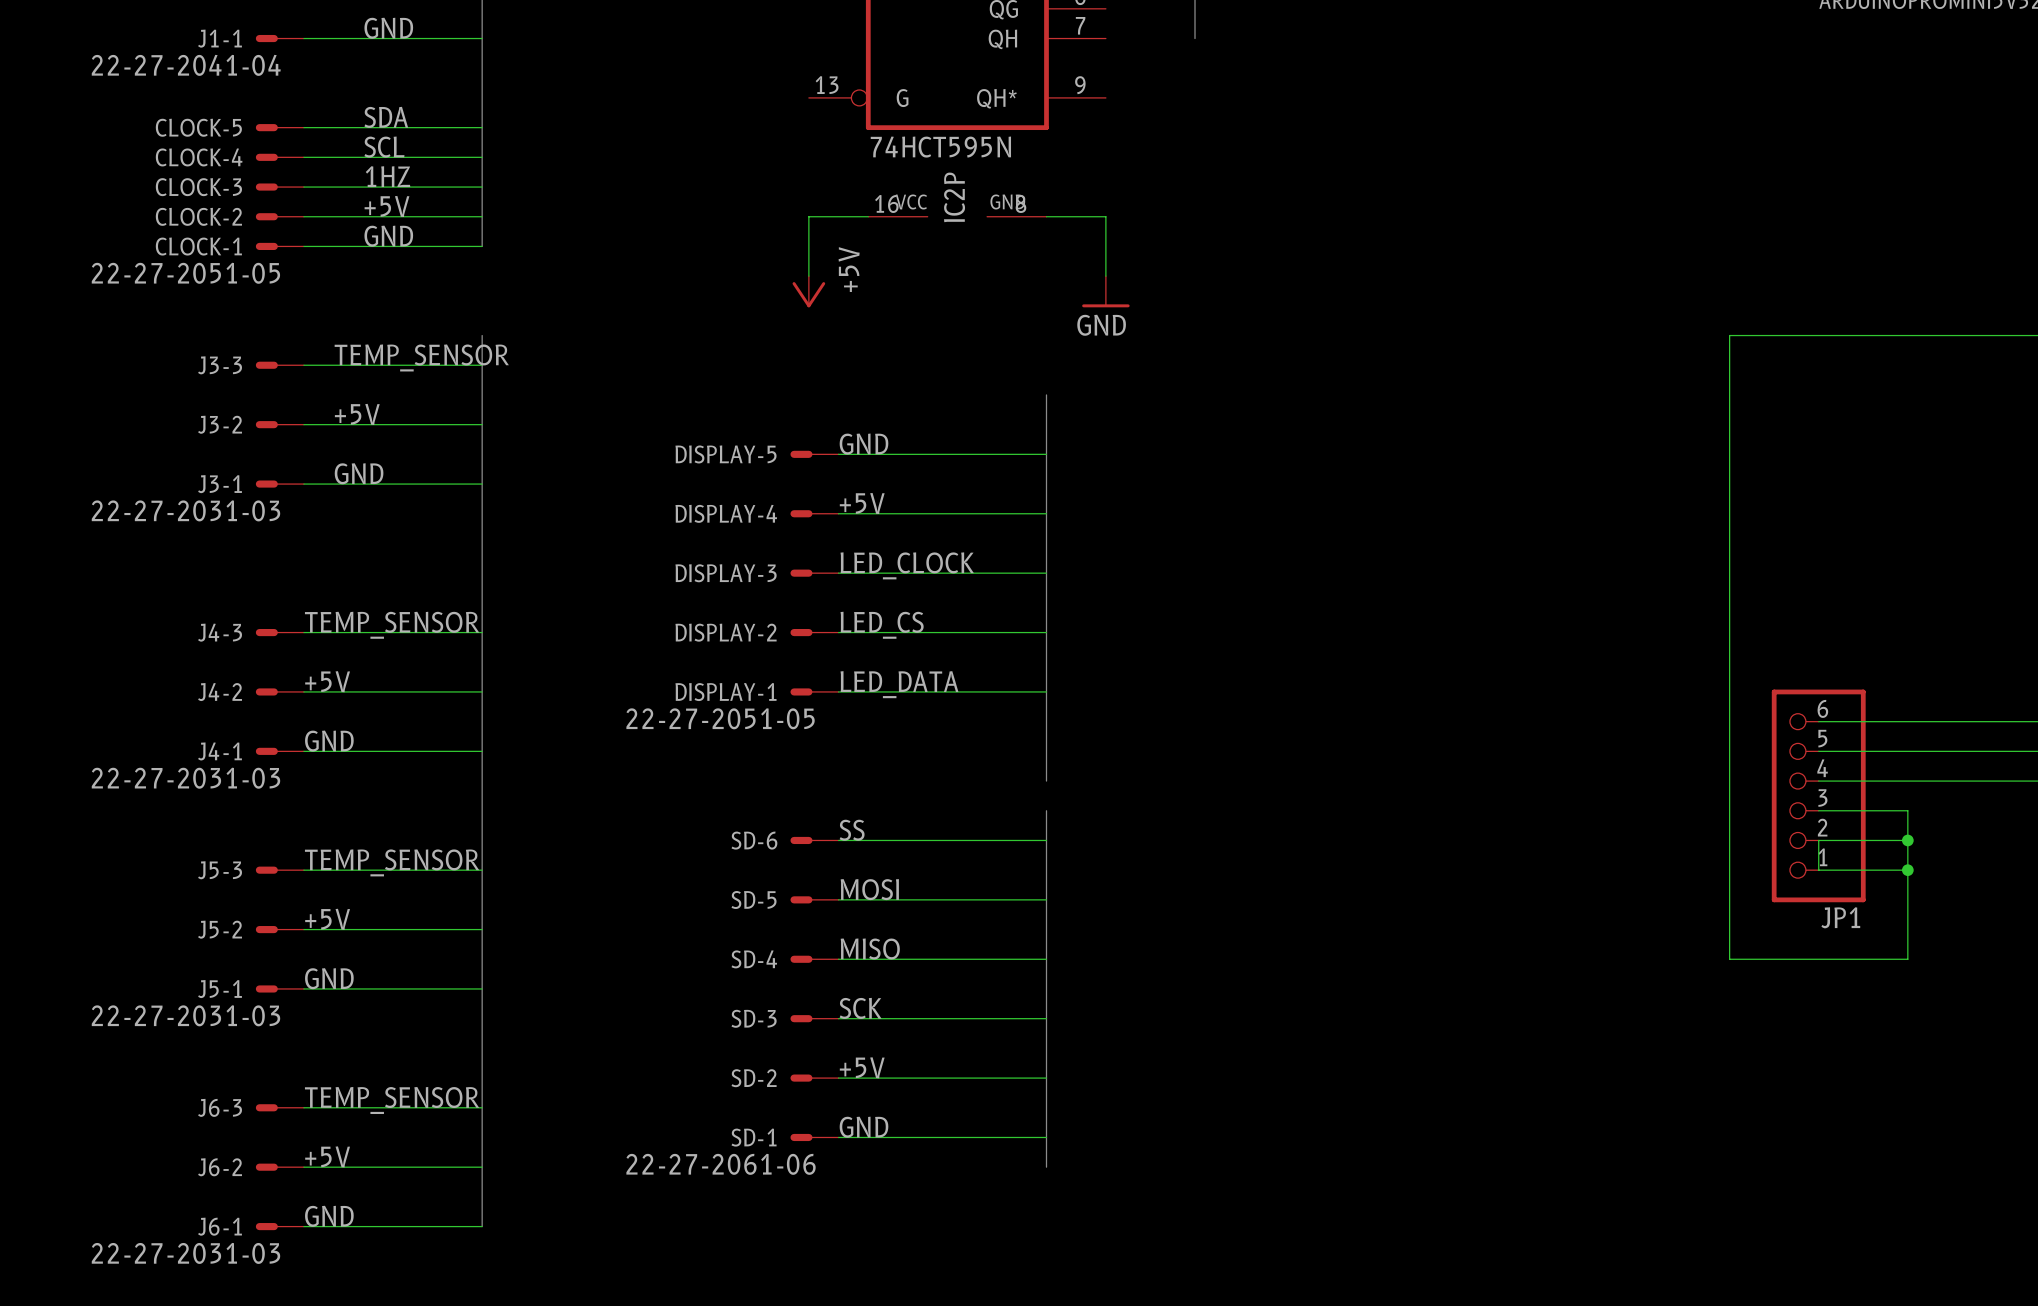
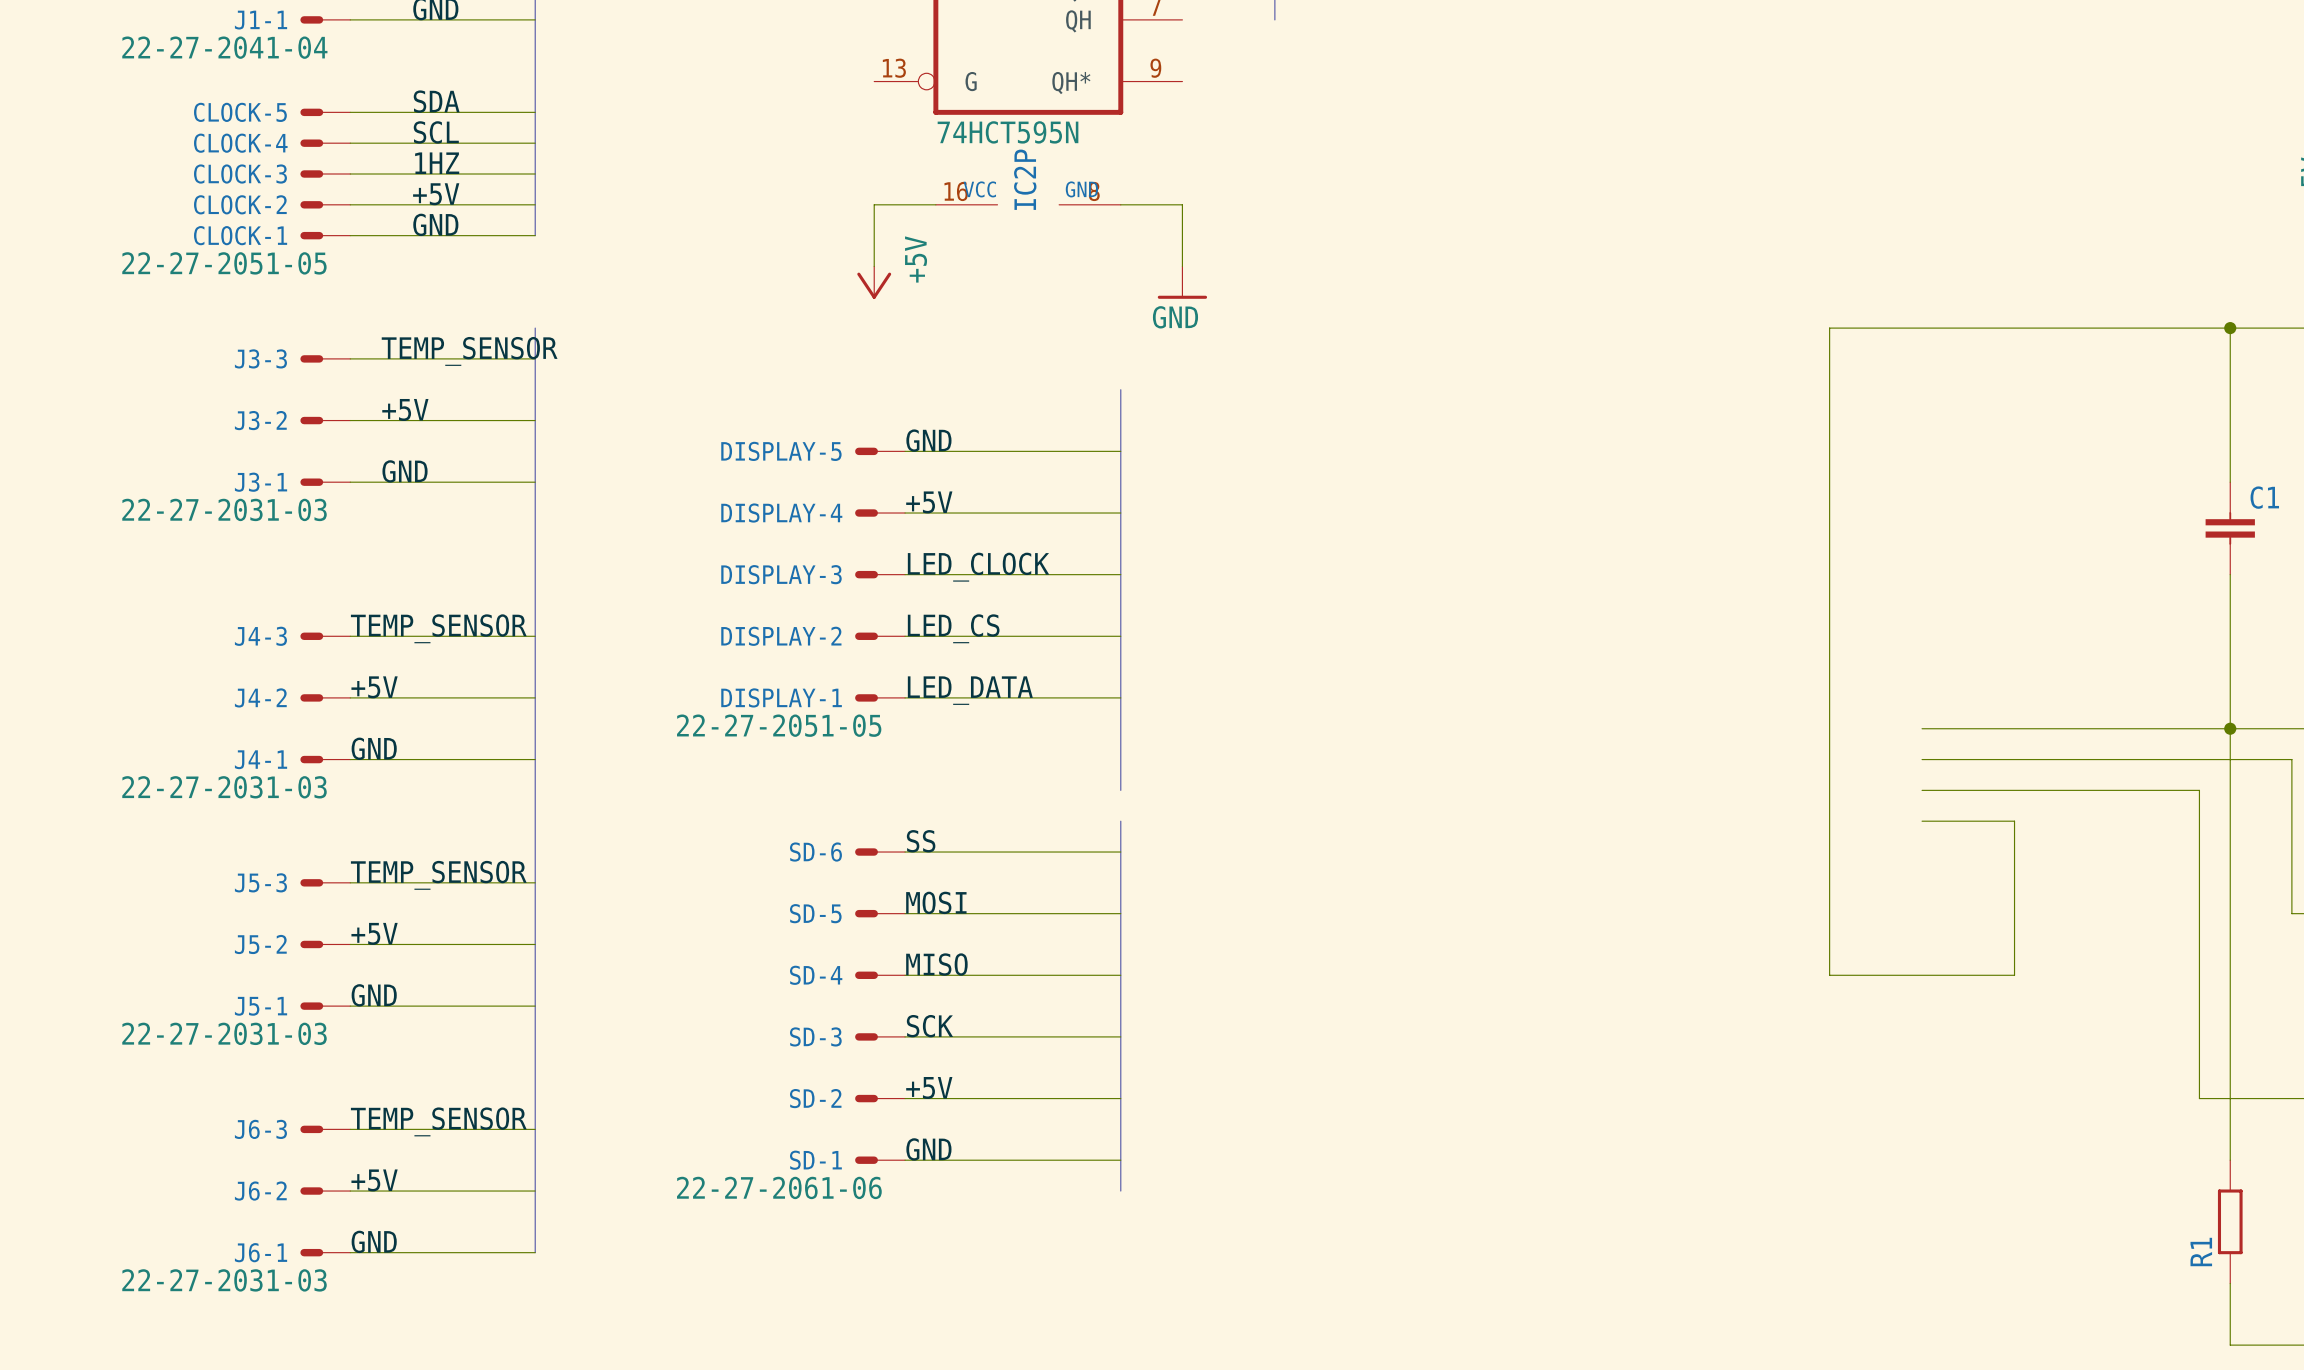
JP1: (1818, 795) -> none
wire: (1907, 840) (1818, 840) (1818, 870) (1907, 870) -> none
junction: (1907, 840) -> none
junction: (1907, 870) -> none

